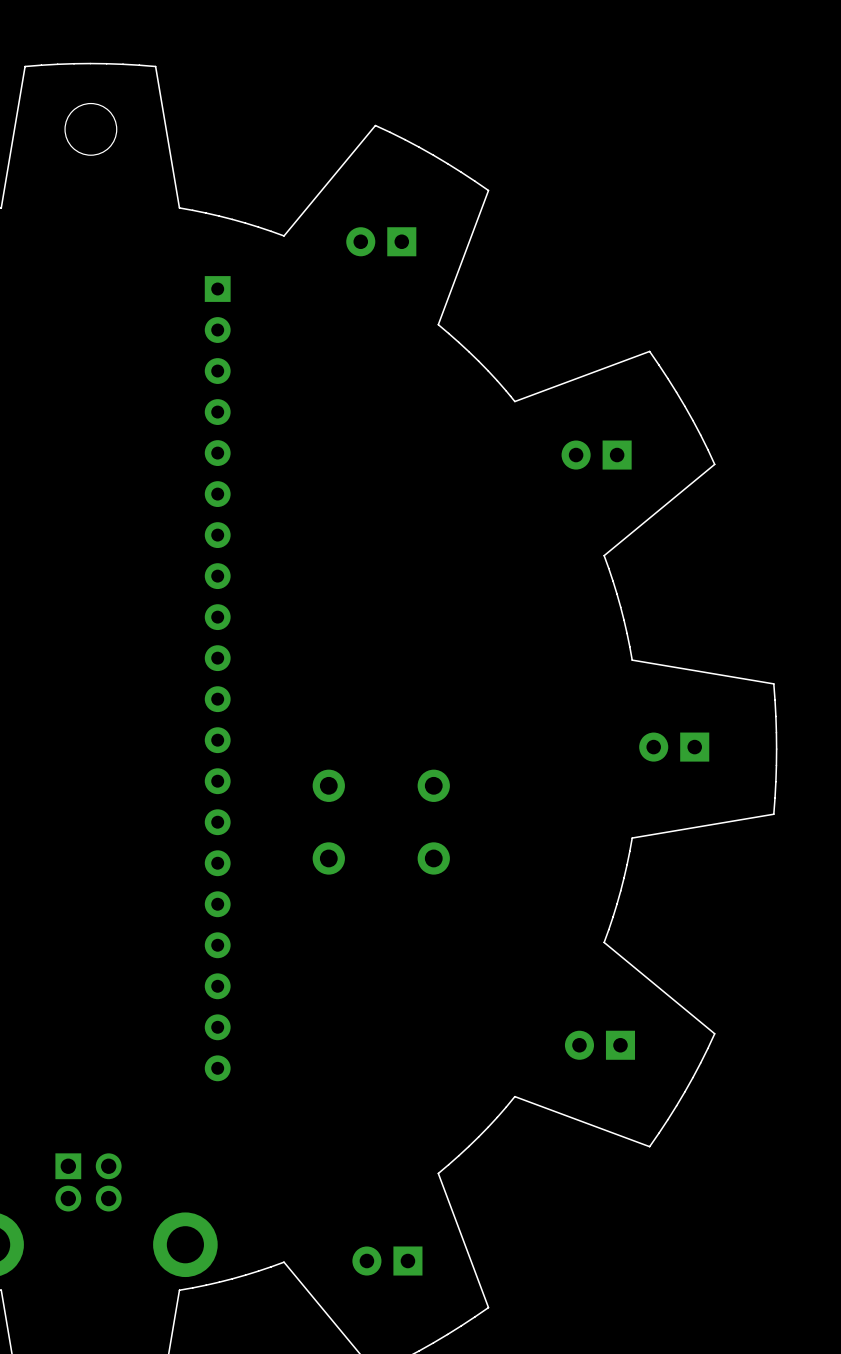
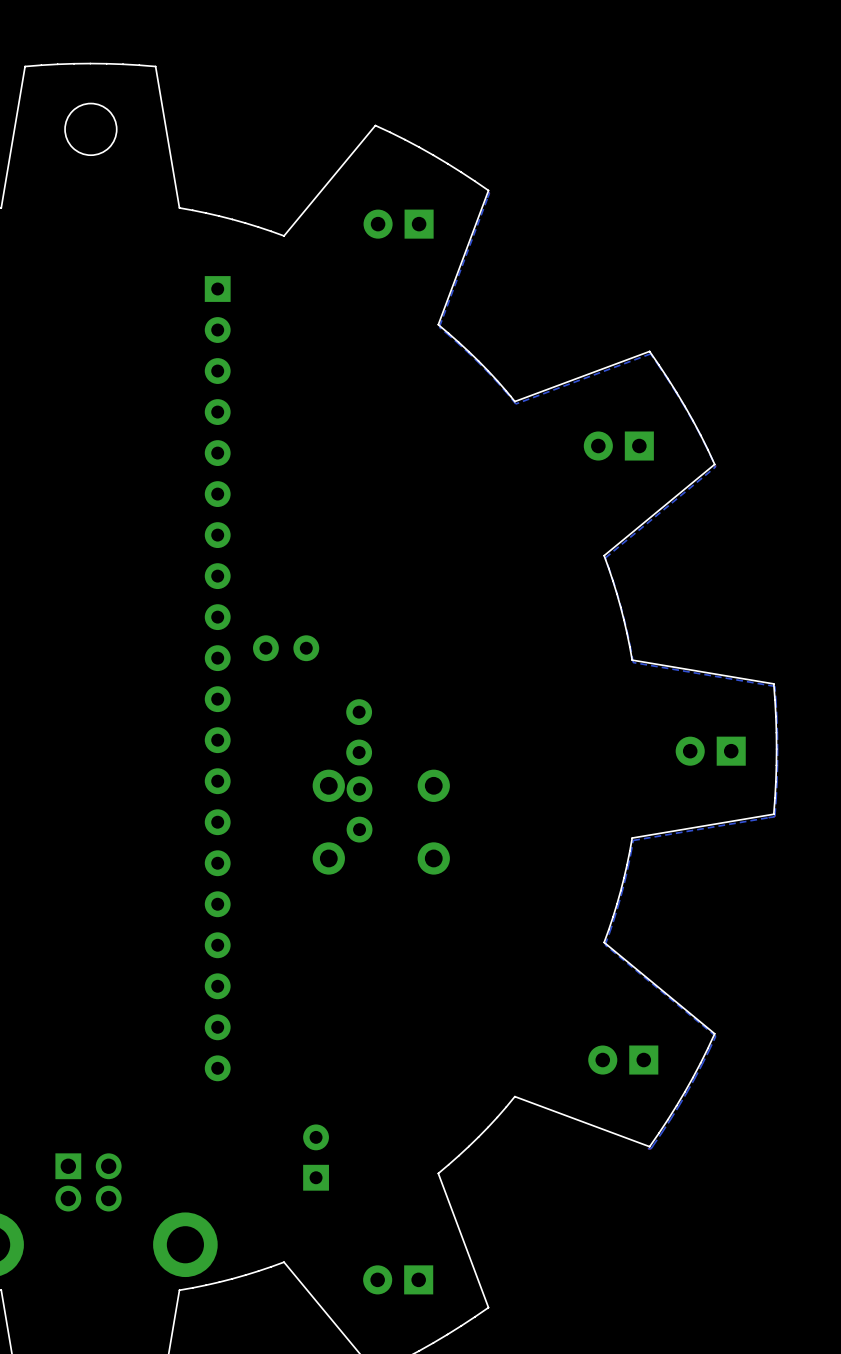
bottom zone outline: none -> (489, 194) (487, 198)
bottom zone outline: none -> (487, 198) (439, 327) (479, 363) (515, 403) (650, 353) (684, 405) (712, 460)
part position: (381, 241) -> (398, 224)
part position: (596, 455) -> (618, 446)
bottom zone outline: none -> (714, 467) (605, 558) (621, 609) (633, 662) (774, 686) (777, 750) (774, 815)
part: none -> (286, 648)
part: none -> (359, 732)
part position: (674, 747) -> (710, 751)
part: none -> (359, 809)
bottom zone outline: none -> (768, 817) (633, 840) (621, 893) (605, 944) (715, 1036) (687, 1092) (651, 1147)
bottom zone outline: none -> (773, 817) (769, 817)
part position: (599, 1045) -> (623, 1060)
part: none -> (316, 1157)
part position: (387, 1261) -> (398, 1279)

